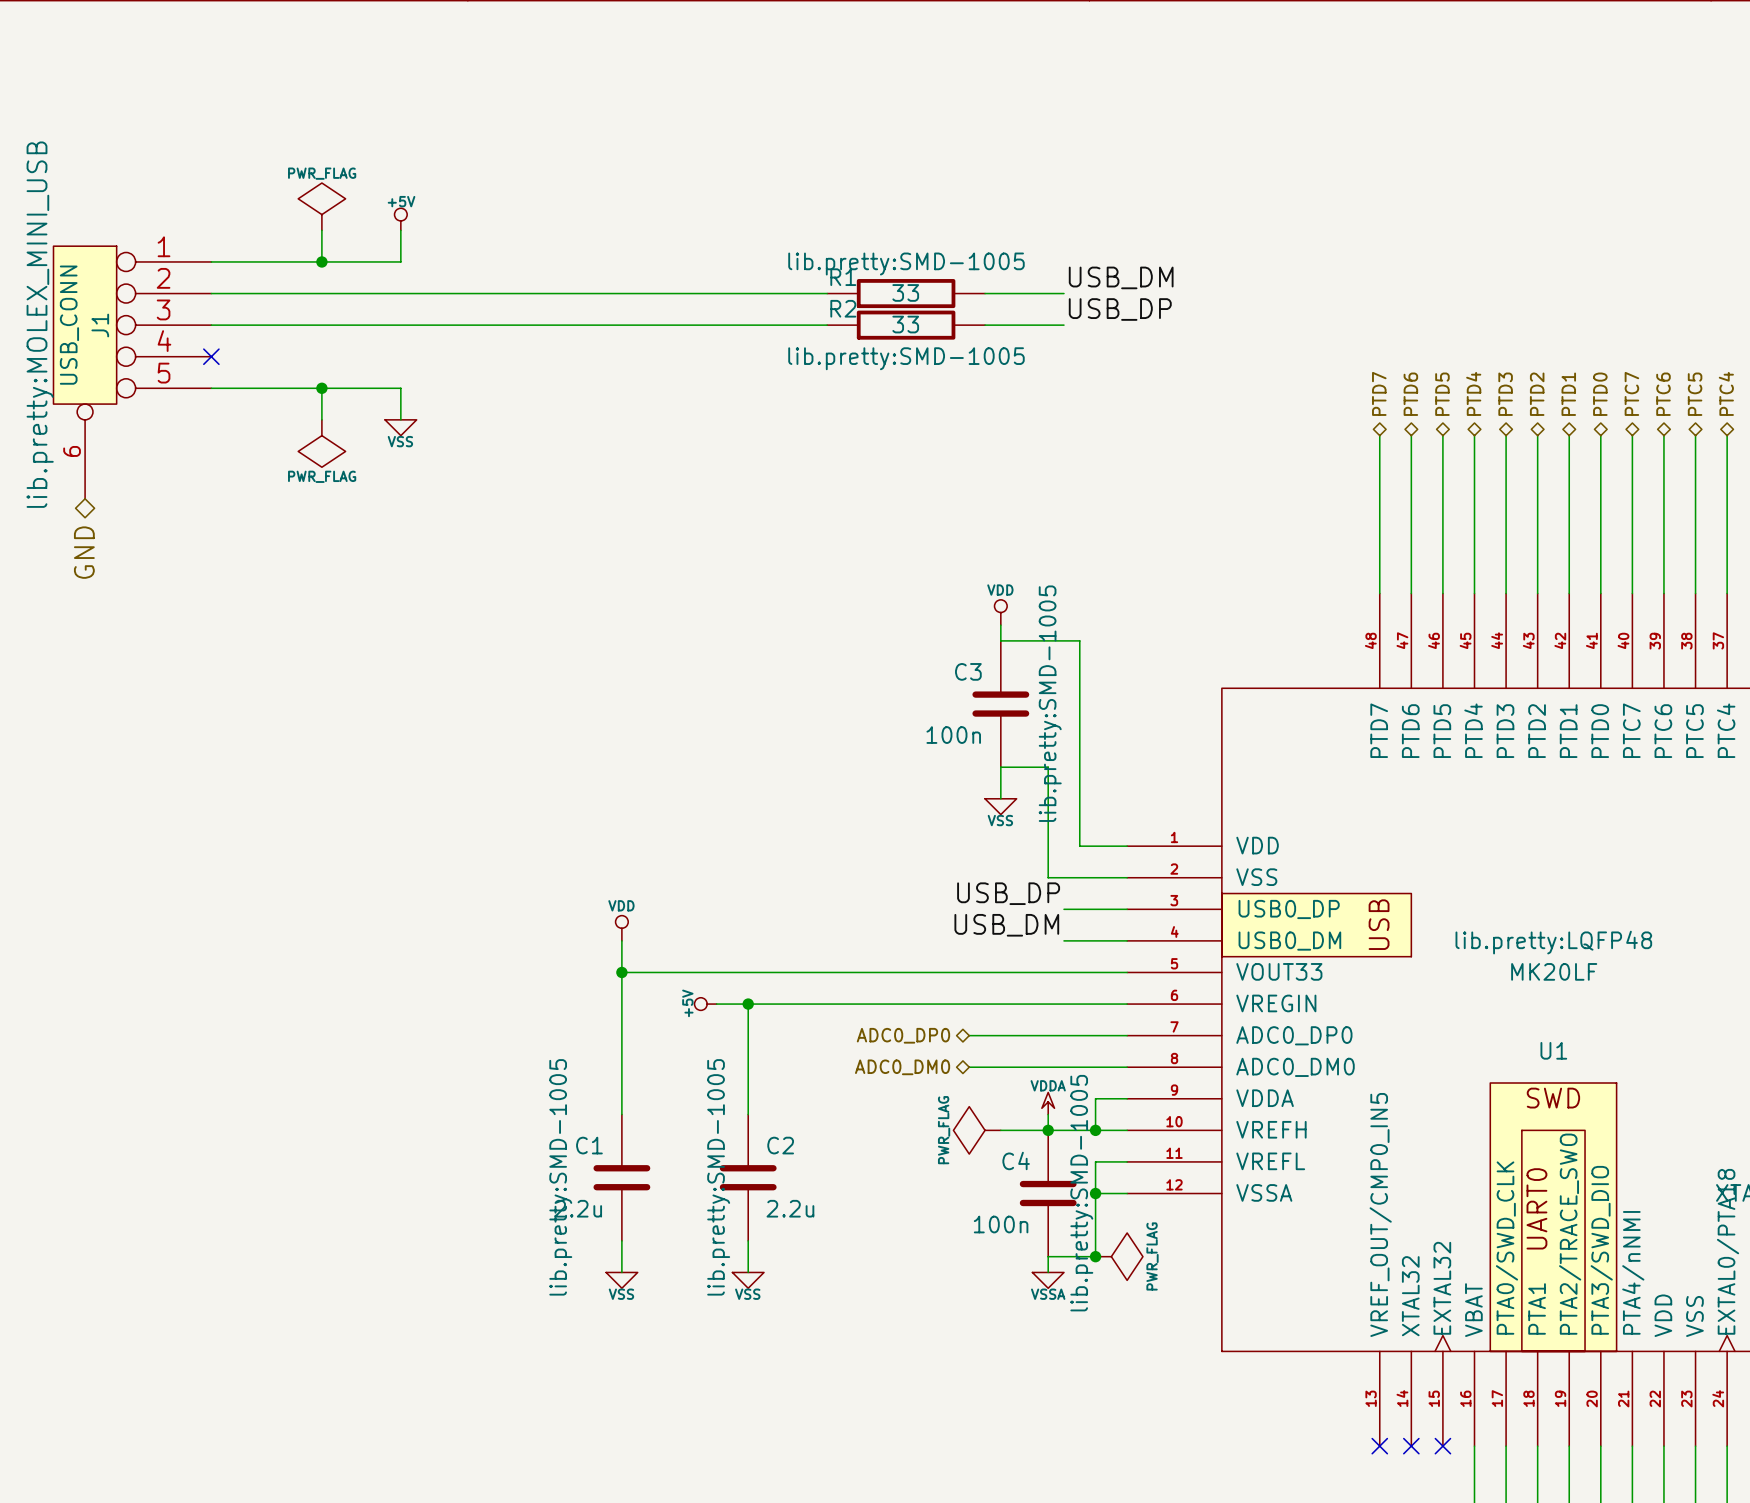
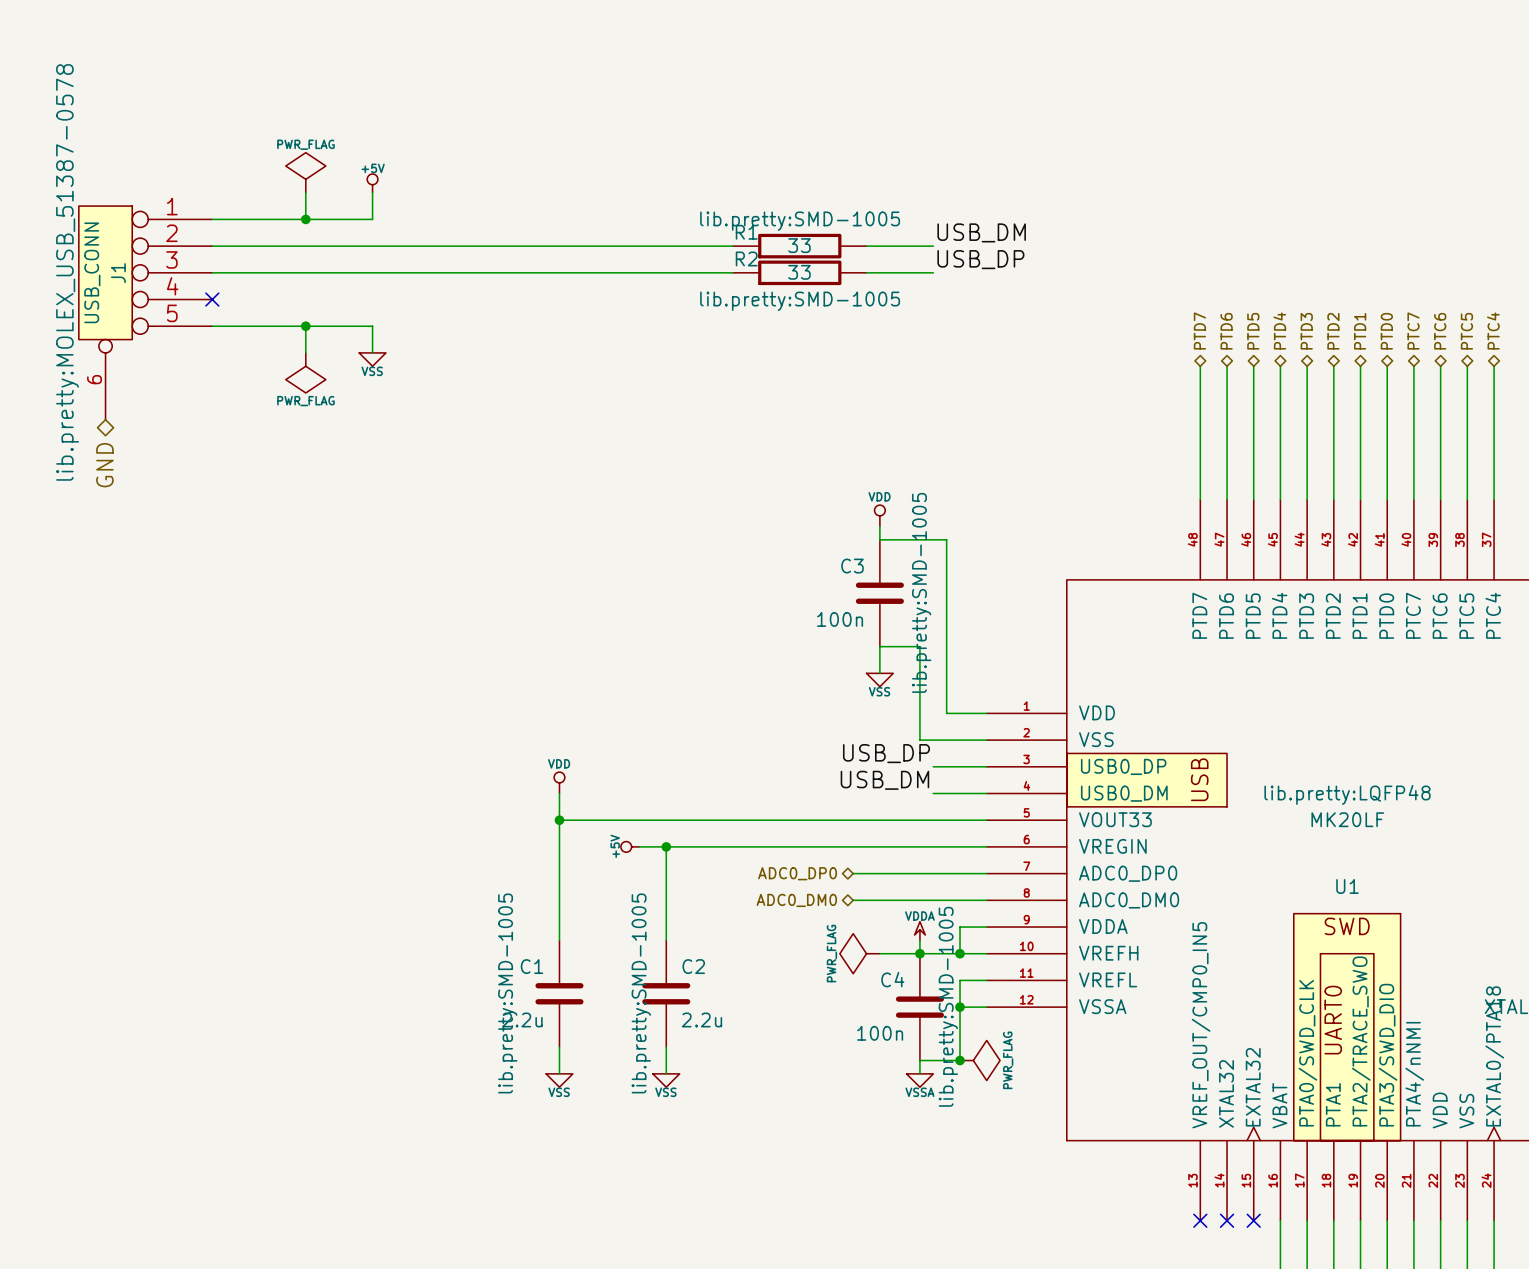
J1 text: lib.pretty:MOLEX_MINI_USB (40, 324) -> lib.pretty:MOLEX_USB_51387-0578 (67, 272)

